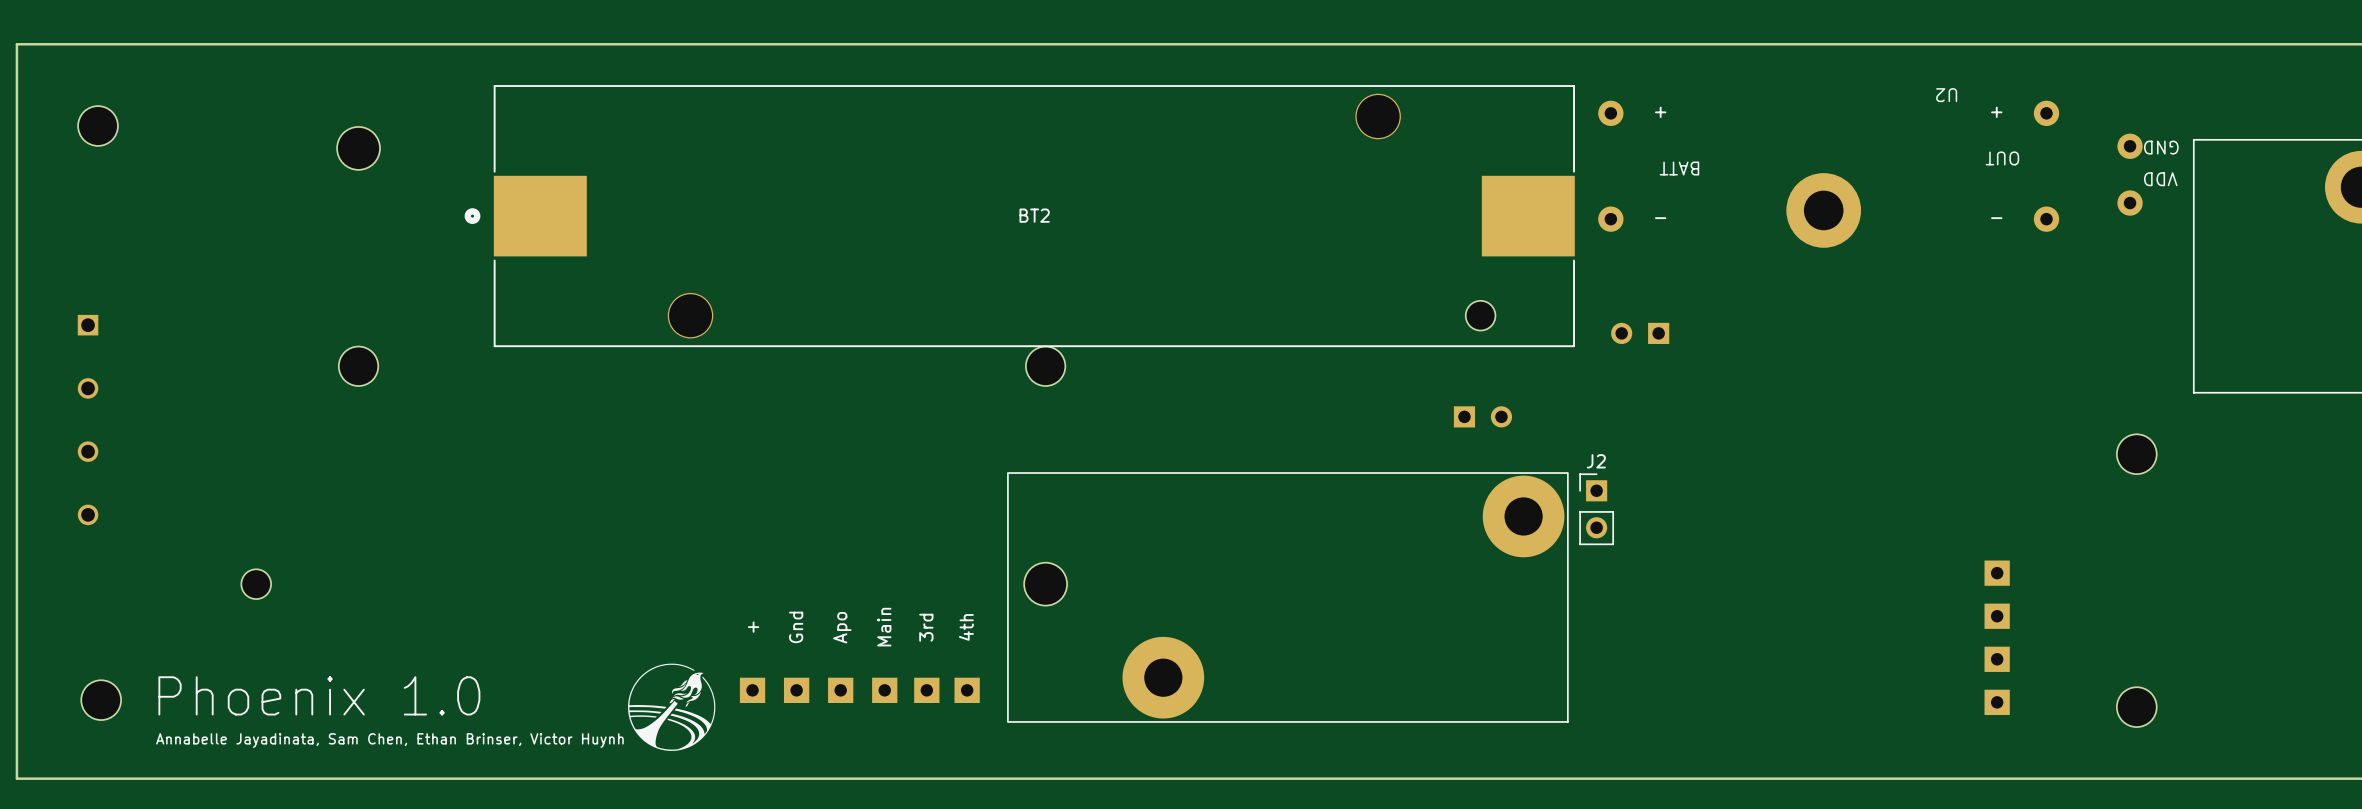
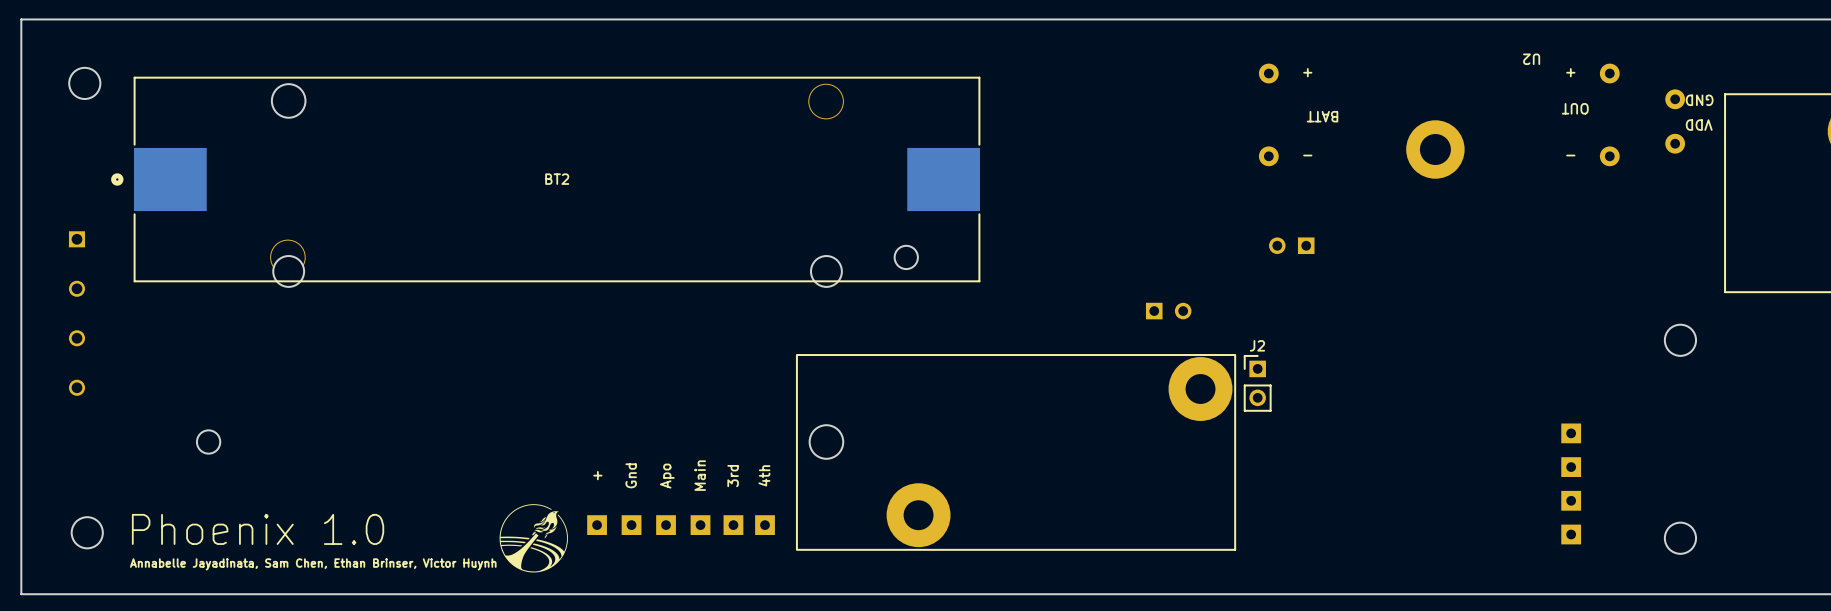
BT2 position: (1019, 216) -> (545, 179)

